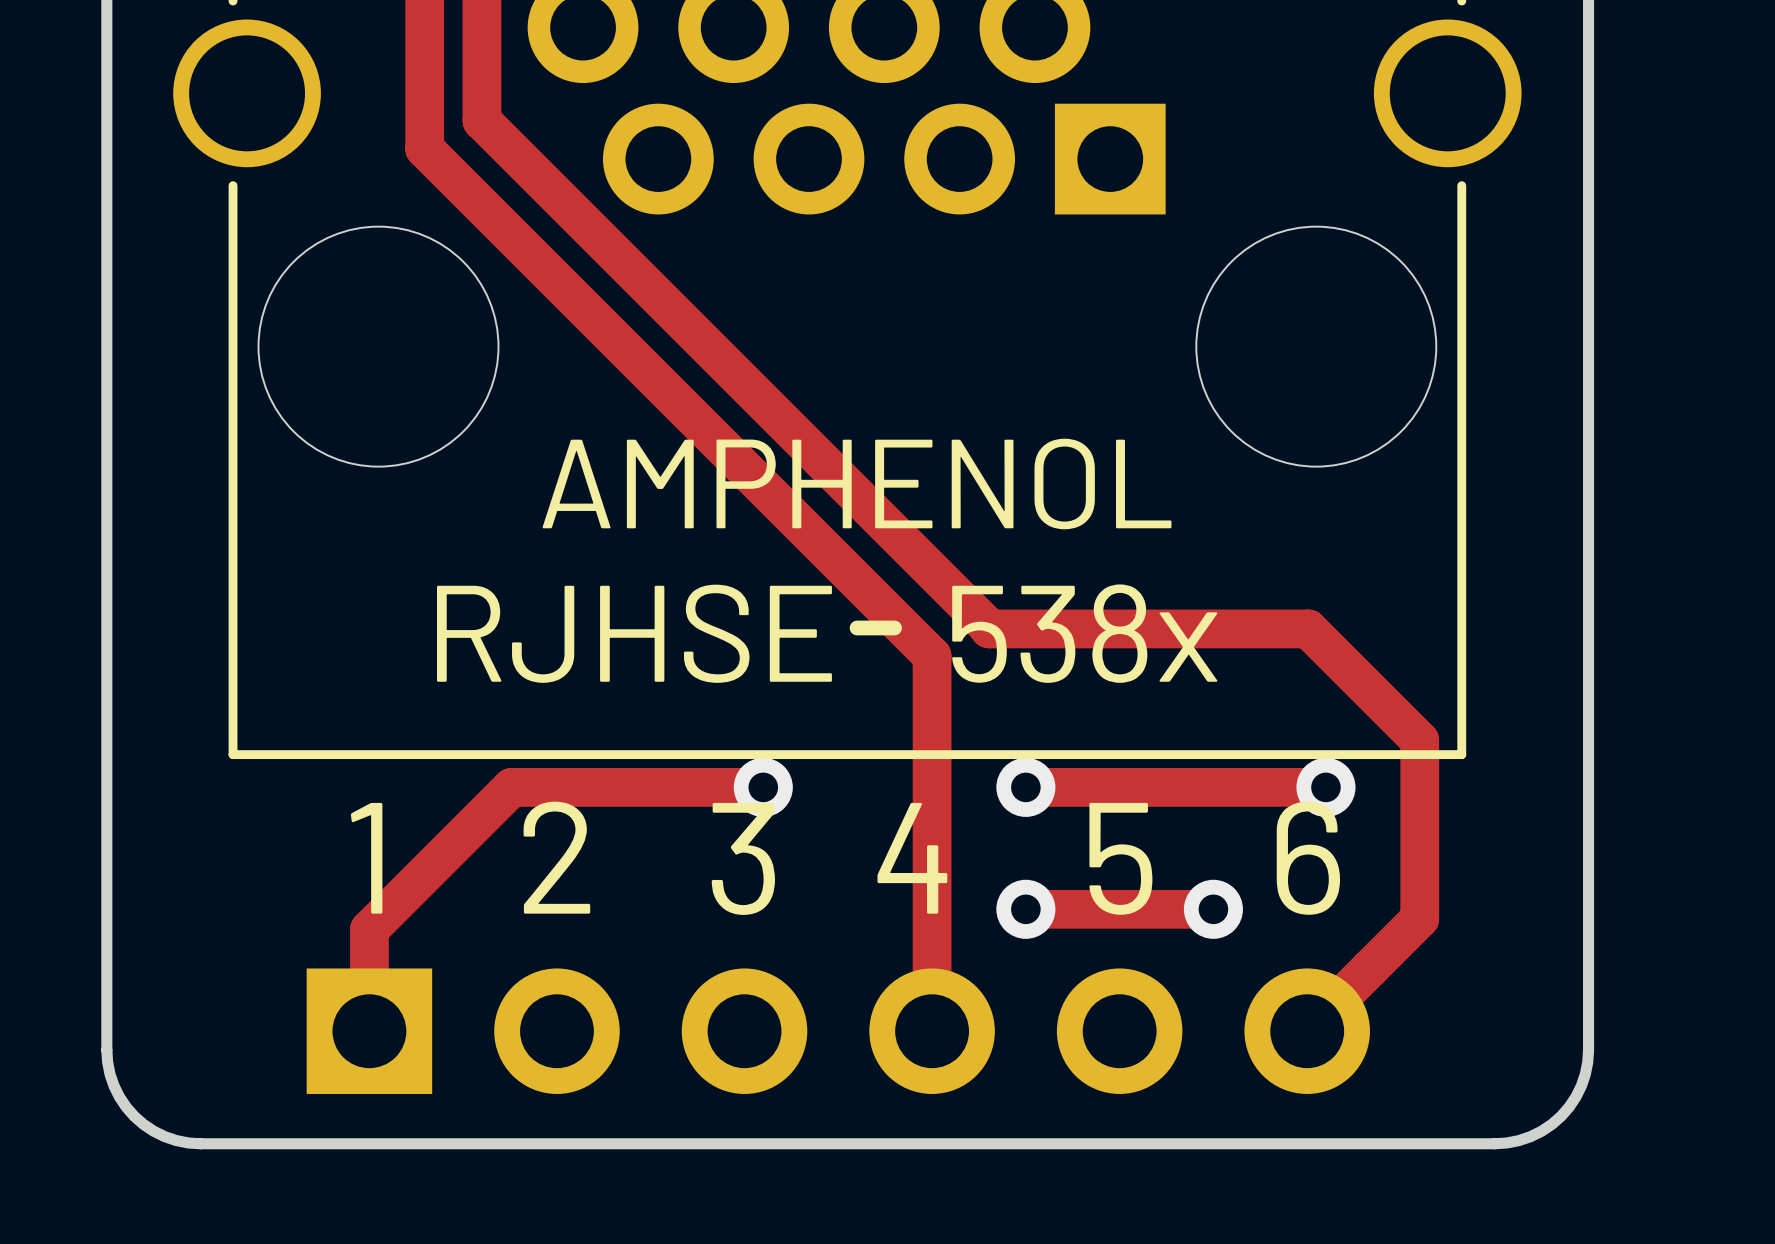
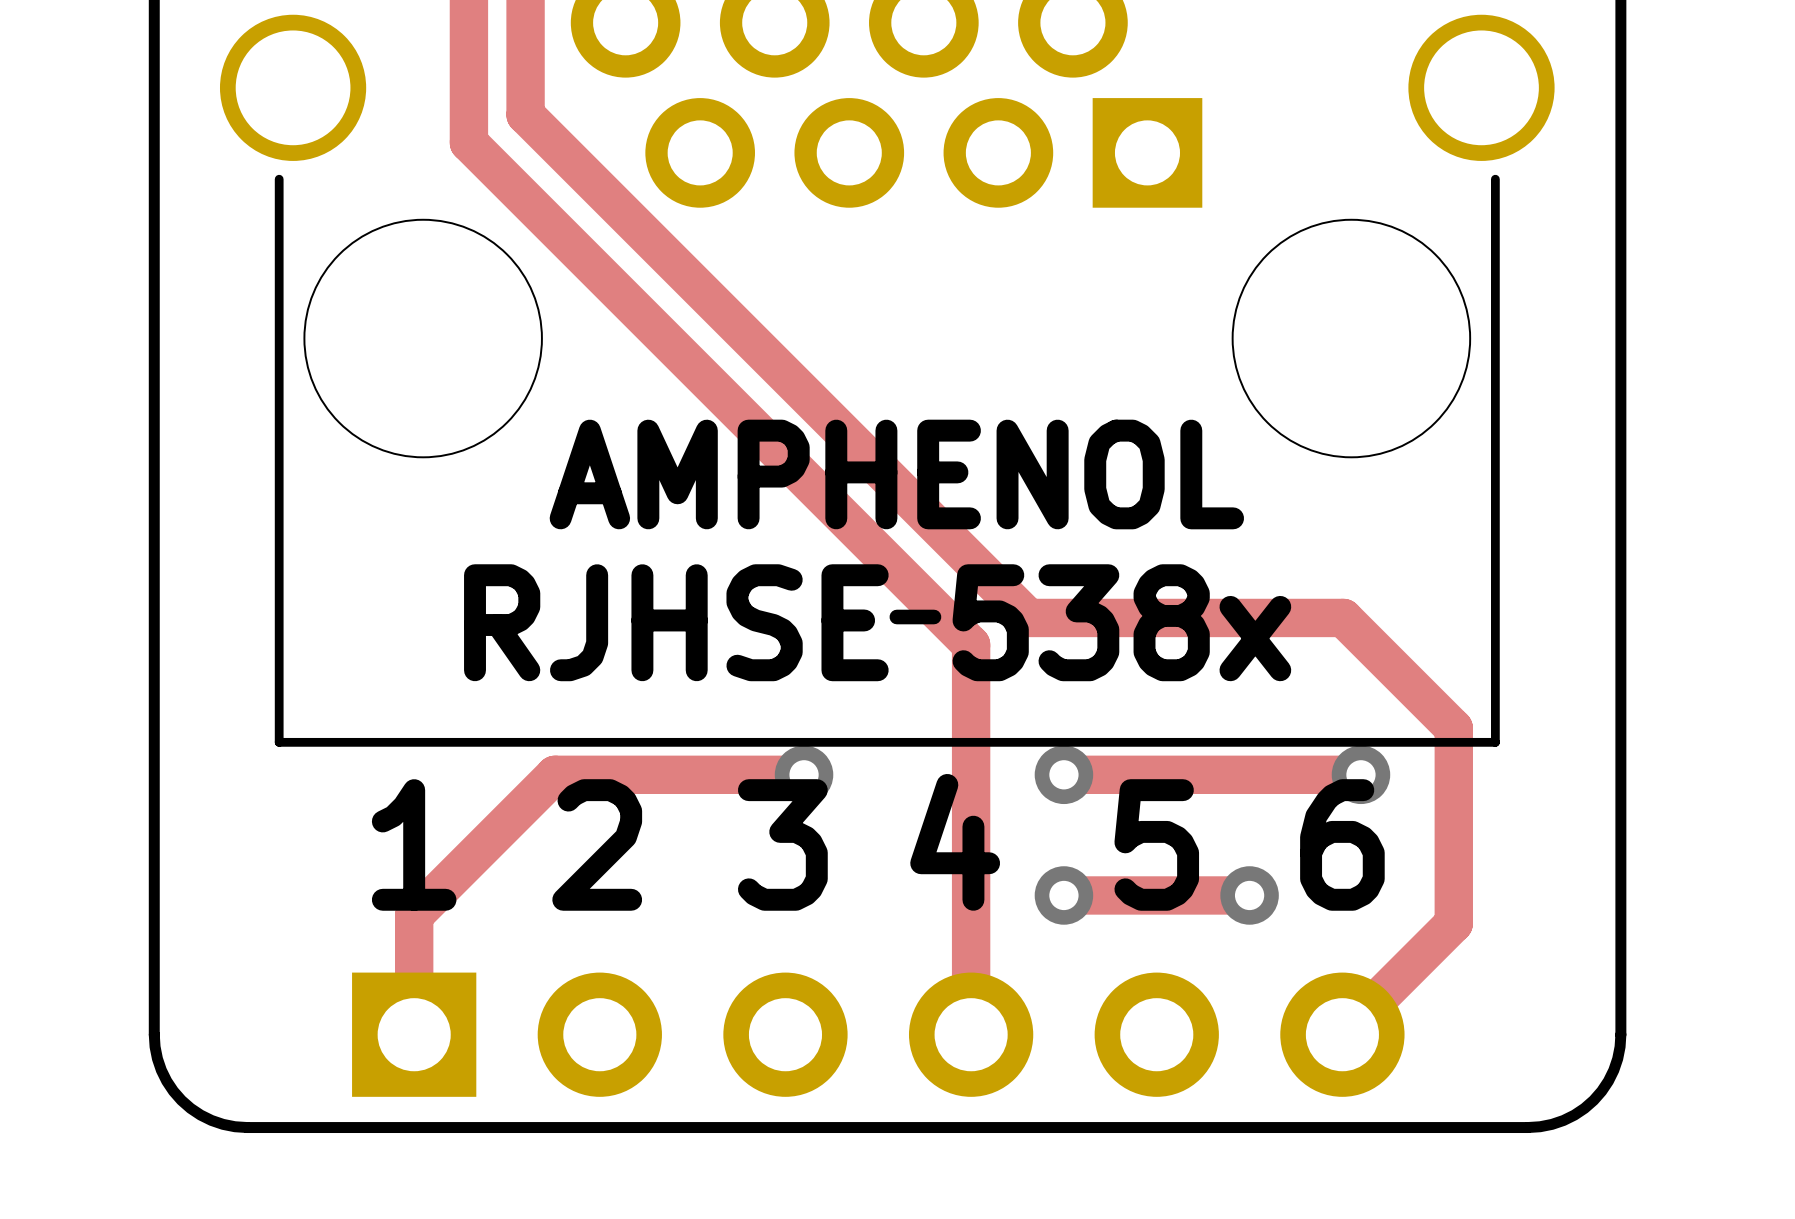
track: (1419, 918) (1307, 1031) -> (1453, 904) (1453, 923) (1342, 1034)
part position: (838, 1031) -> (878, 1034)

